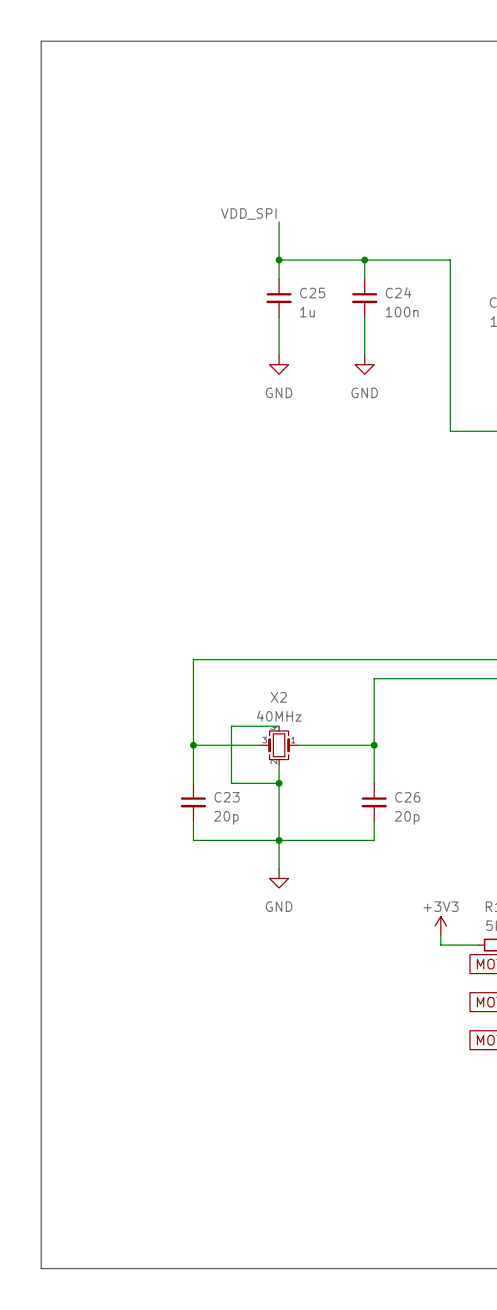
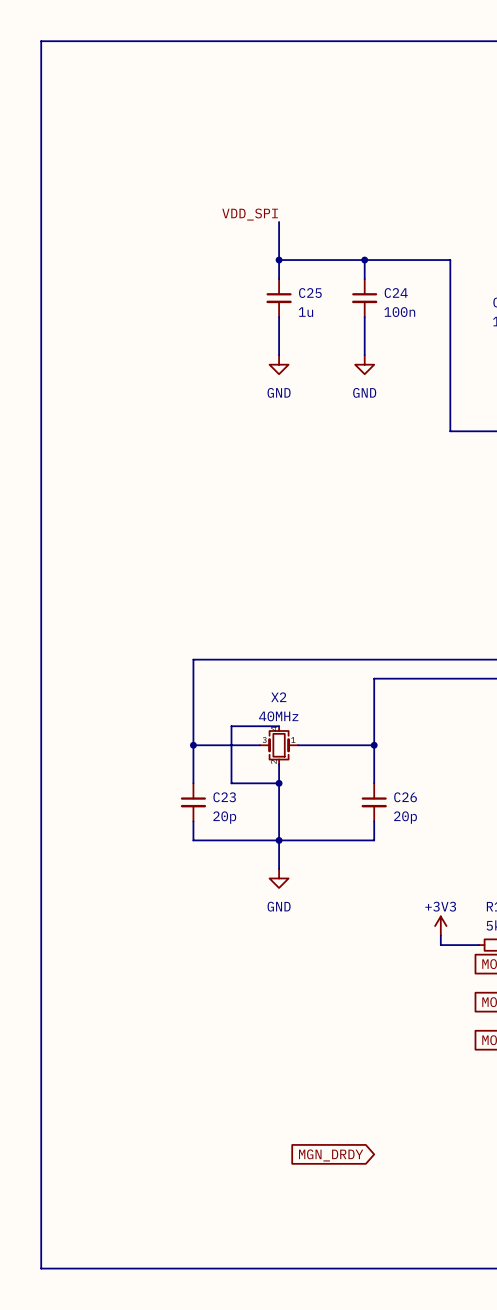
global label: none -> MGN_DRDY (331, 1155)

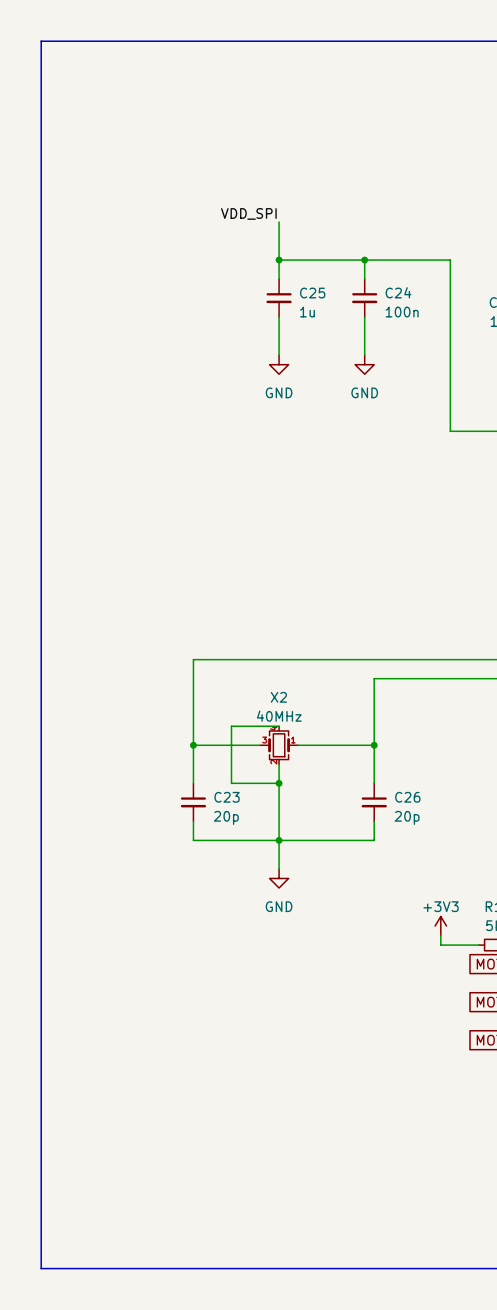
global label: MGN_DRDY (331, 1155) -> none

